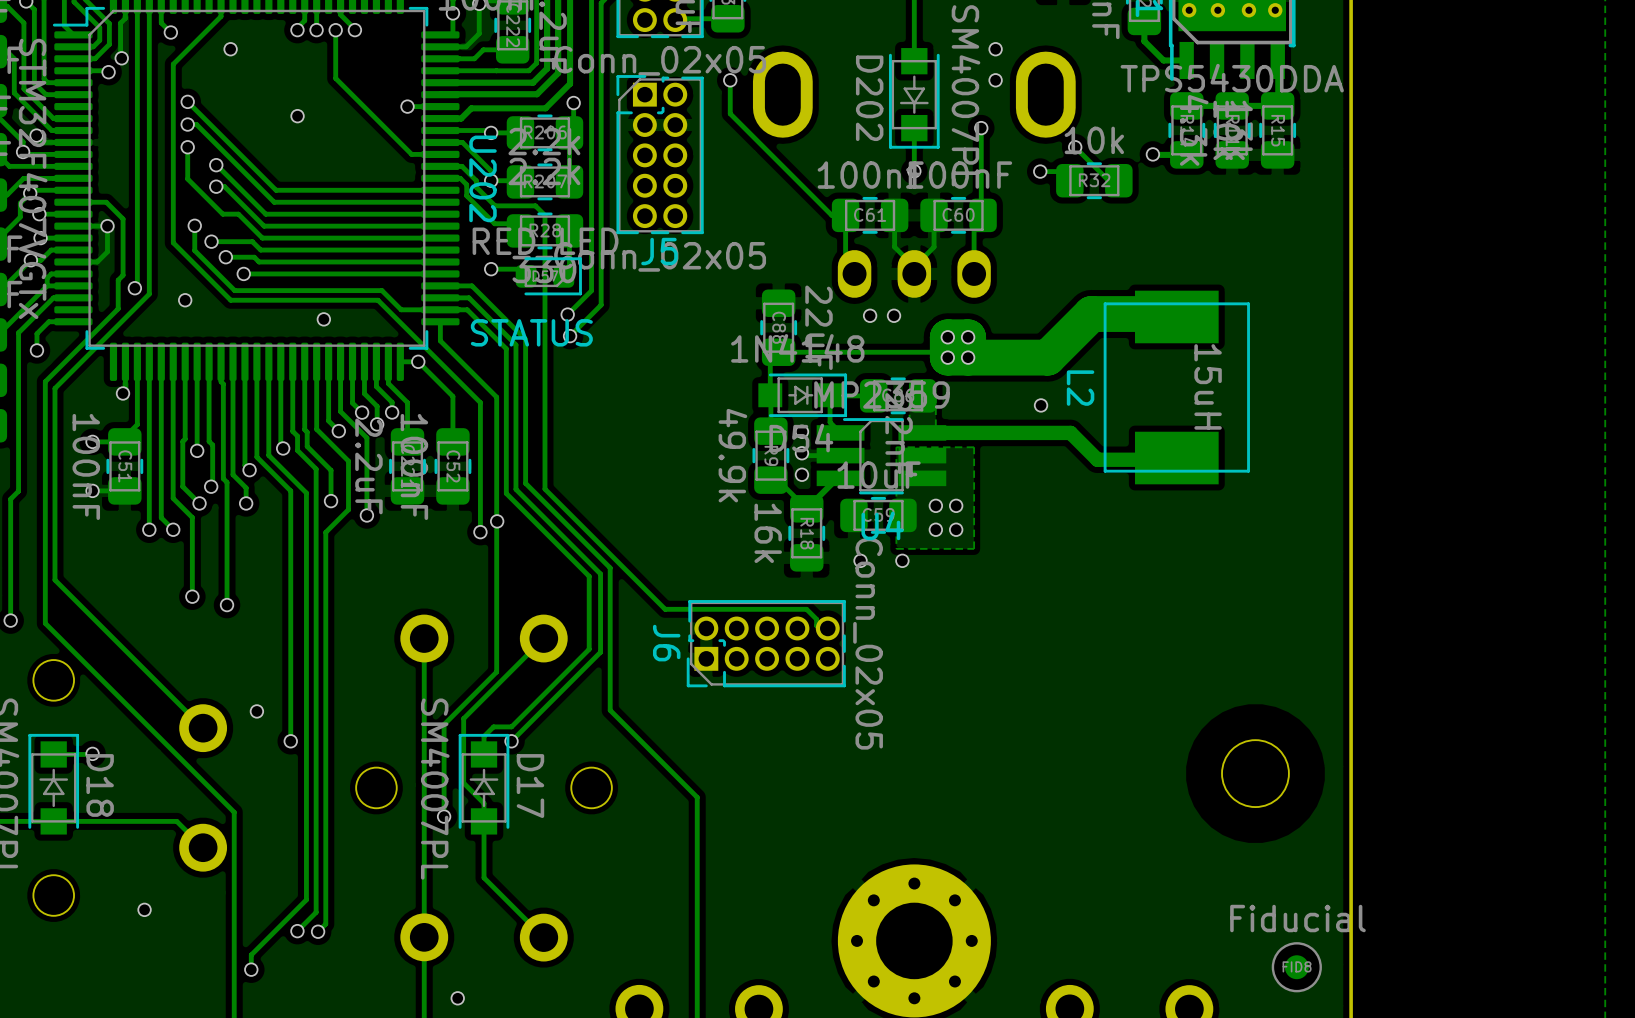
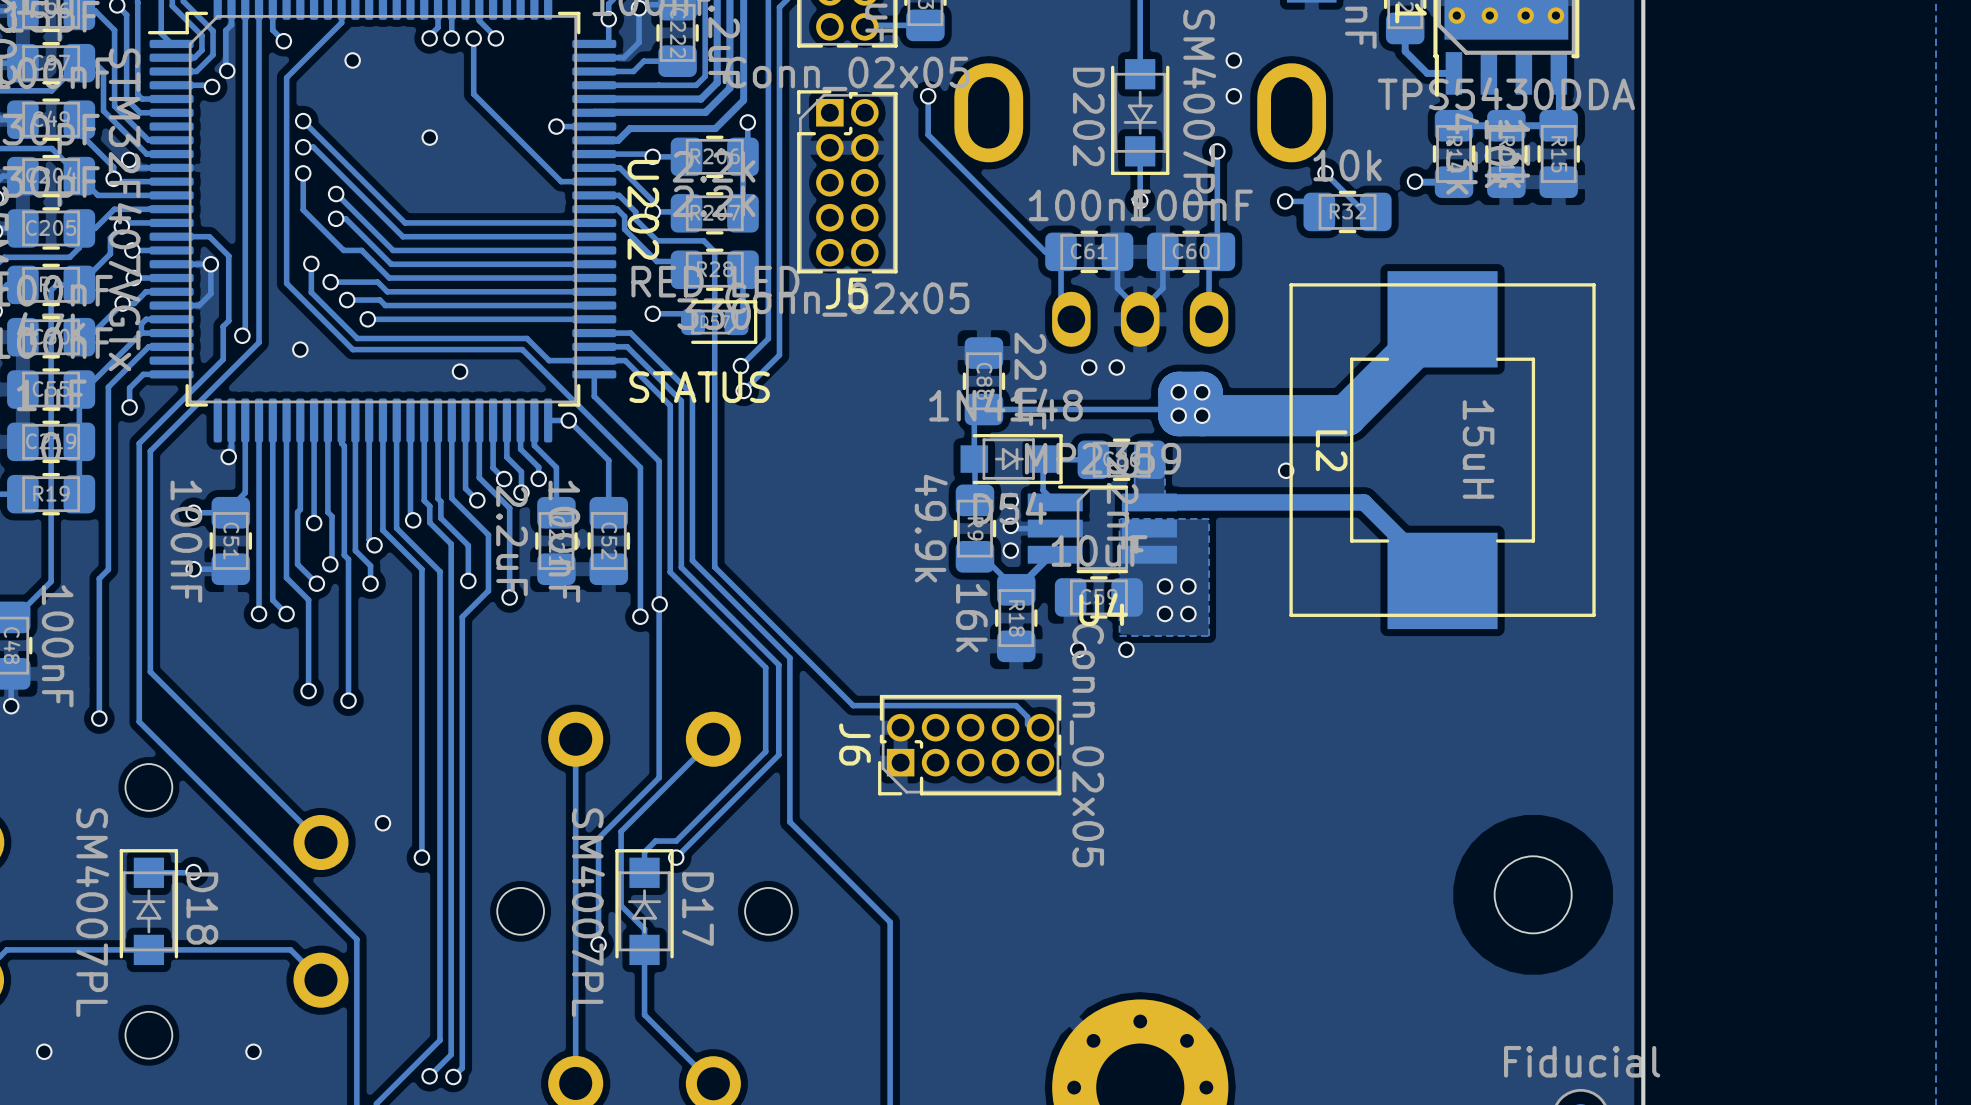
L2 footprint: [1103, 290, 1250, 485] -> [1289, 271, 1596, 630]
track: (1176, 314) (1091, 314) (1047, 357) -> (1442, 319) (1346, 415) (1293, 415)
track: (1070, 432) (1097, 459) (1176, 459) -> (1320, 502) (1364, 502) (1442, 580)

